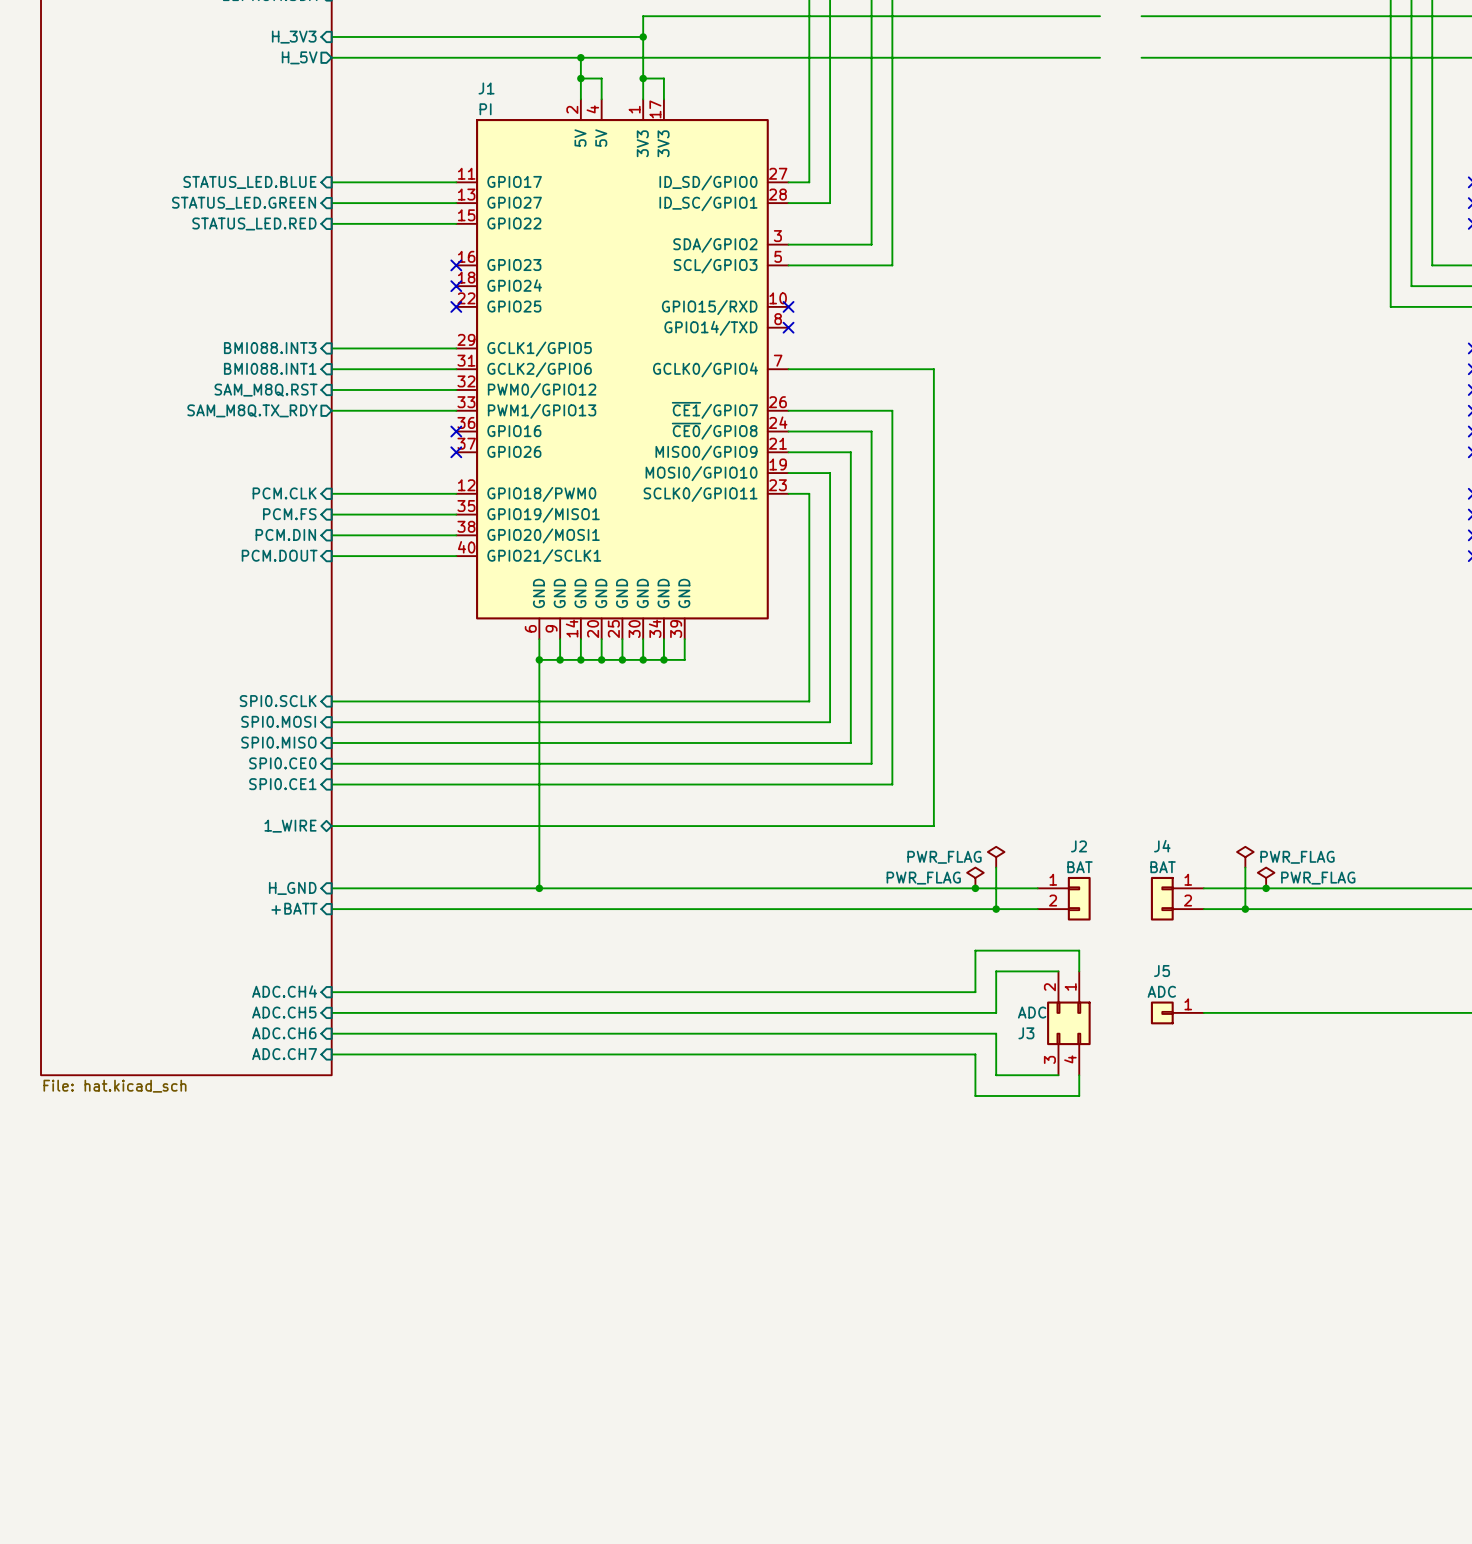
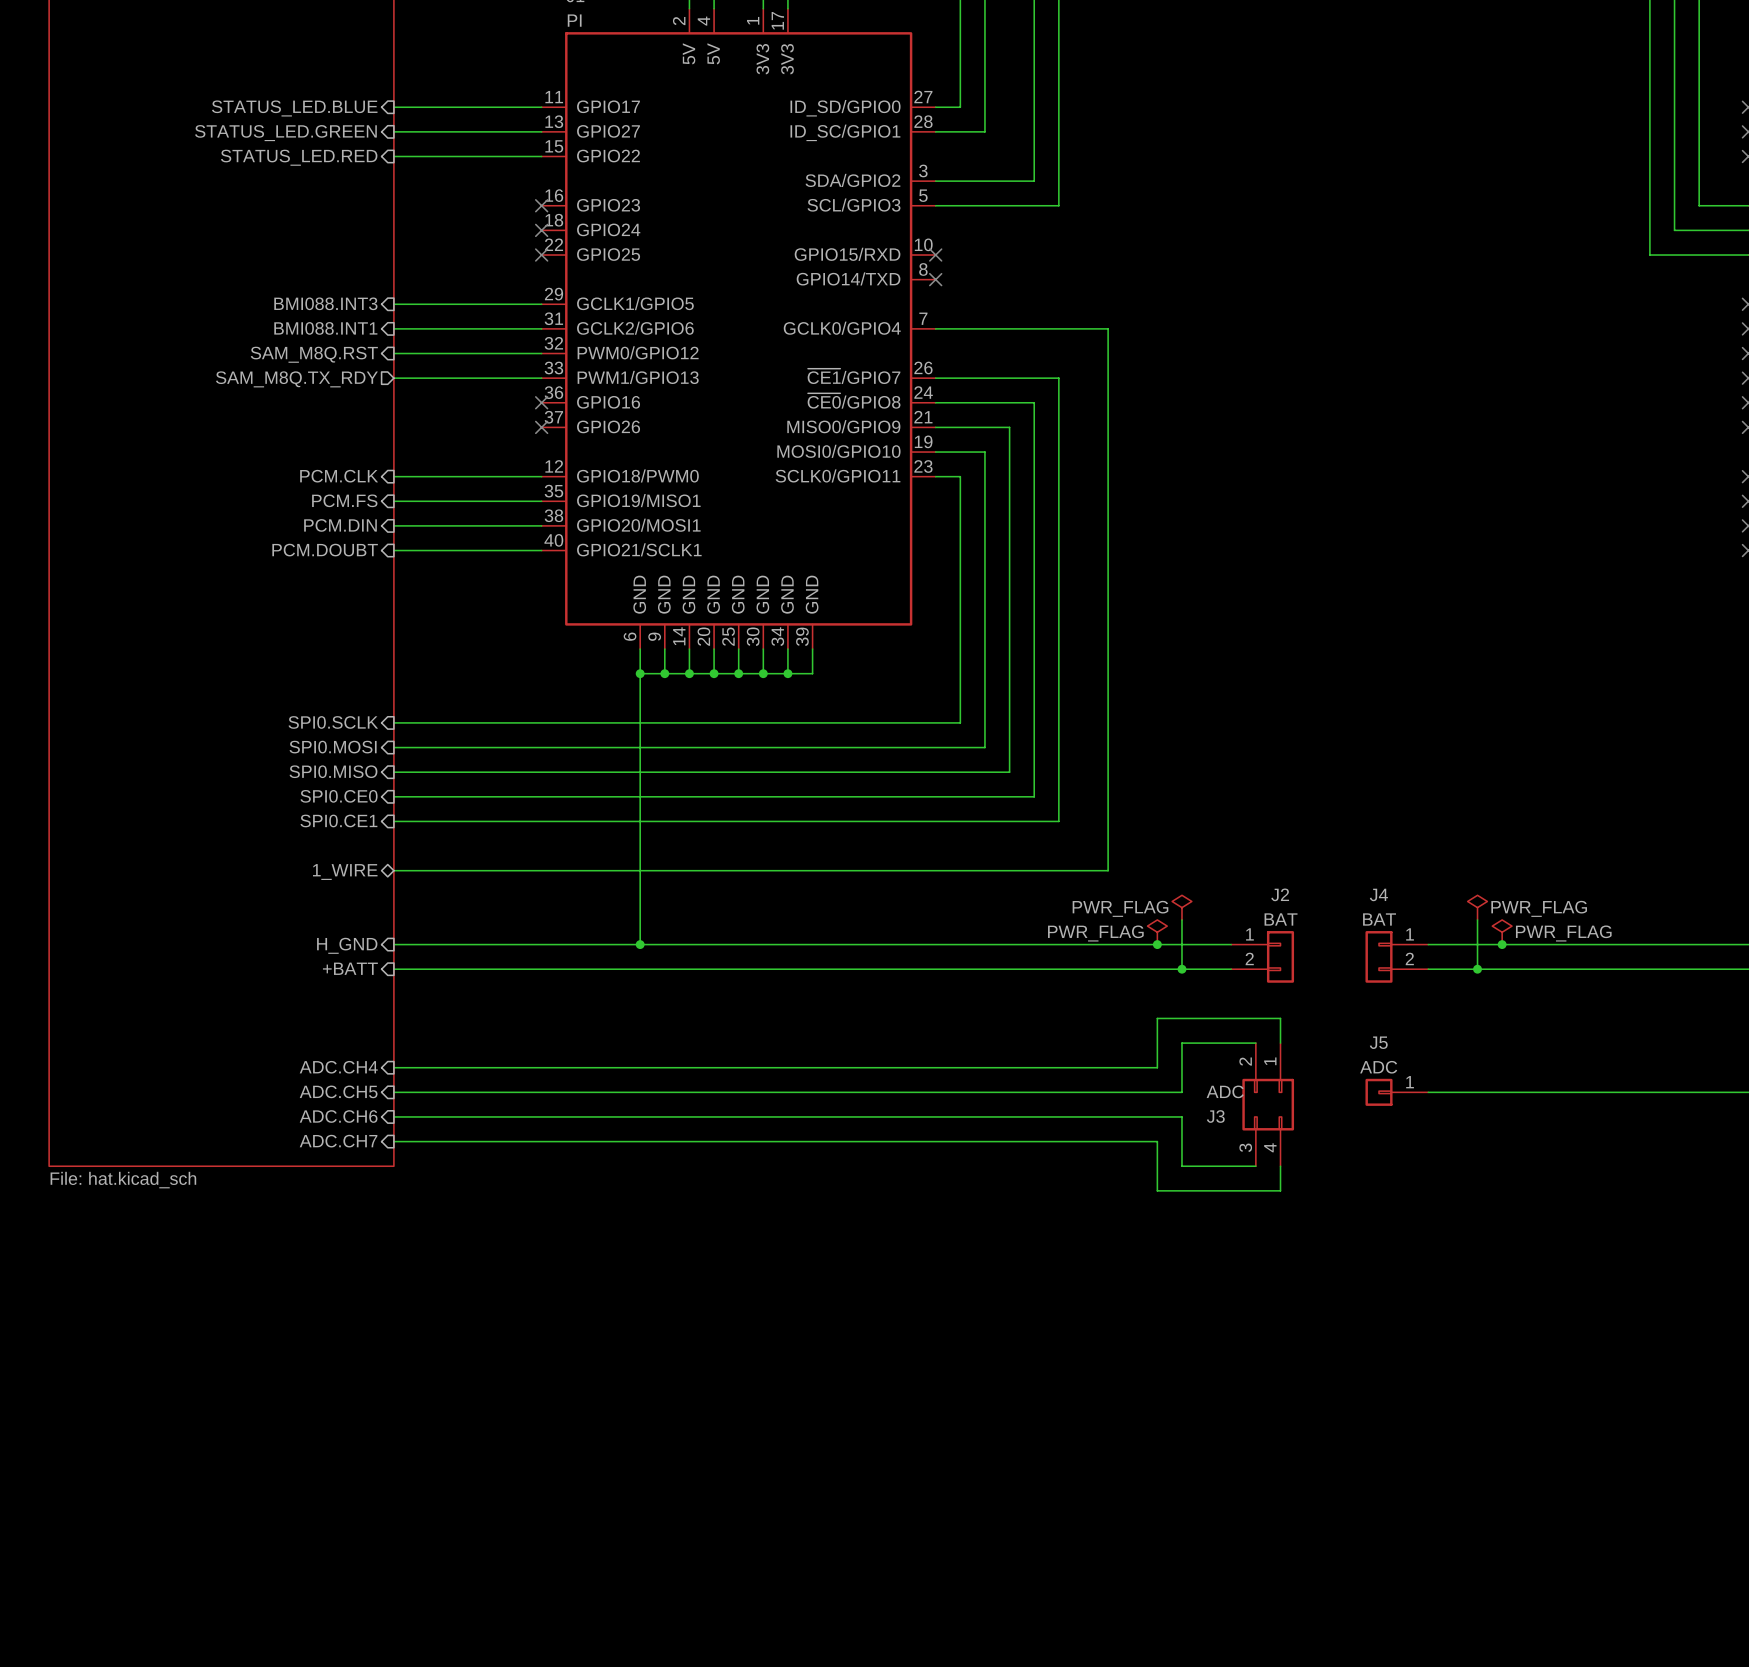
sheet pin: PCM.DOUT (279, 555) -> PCM.DOUBT (325, 550)

